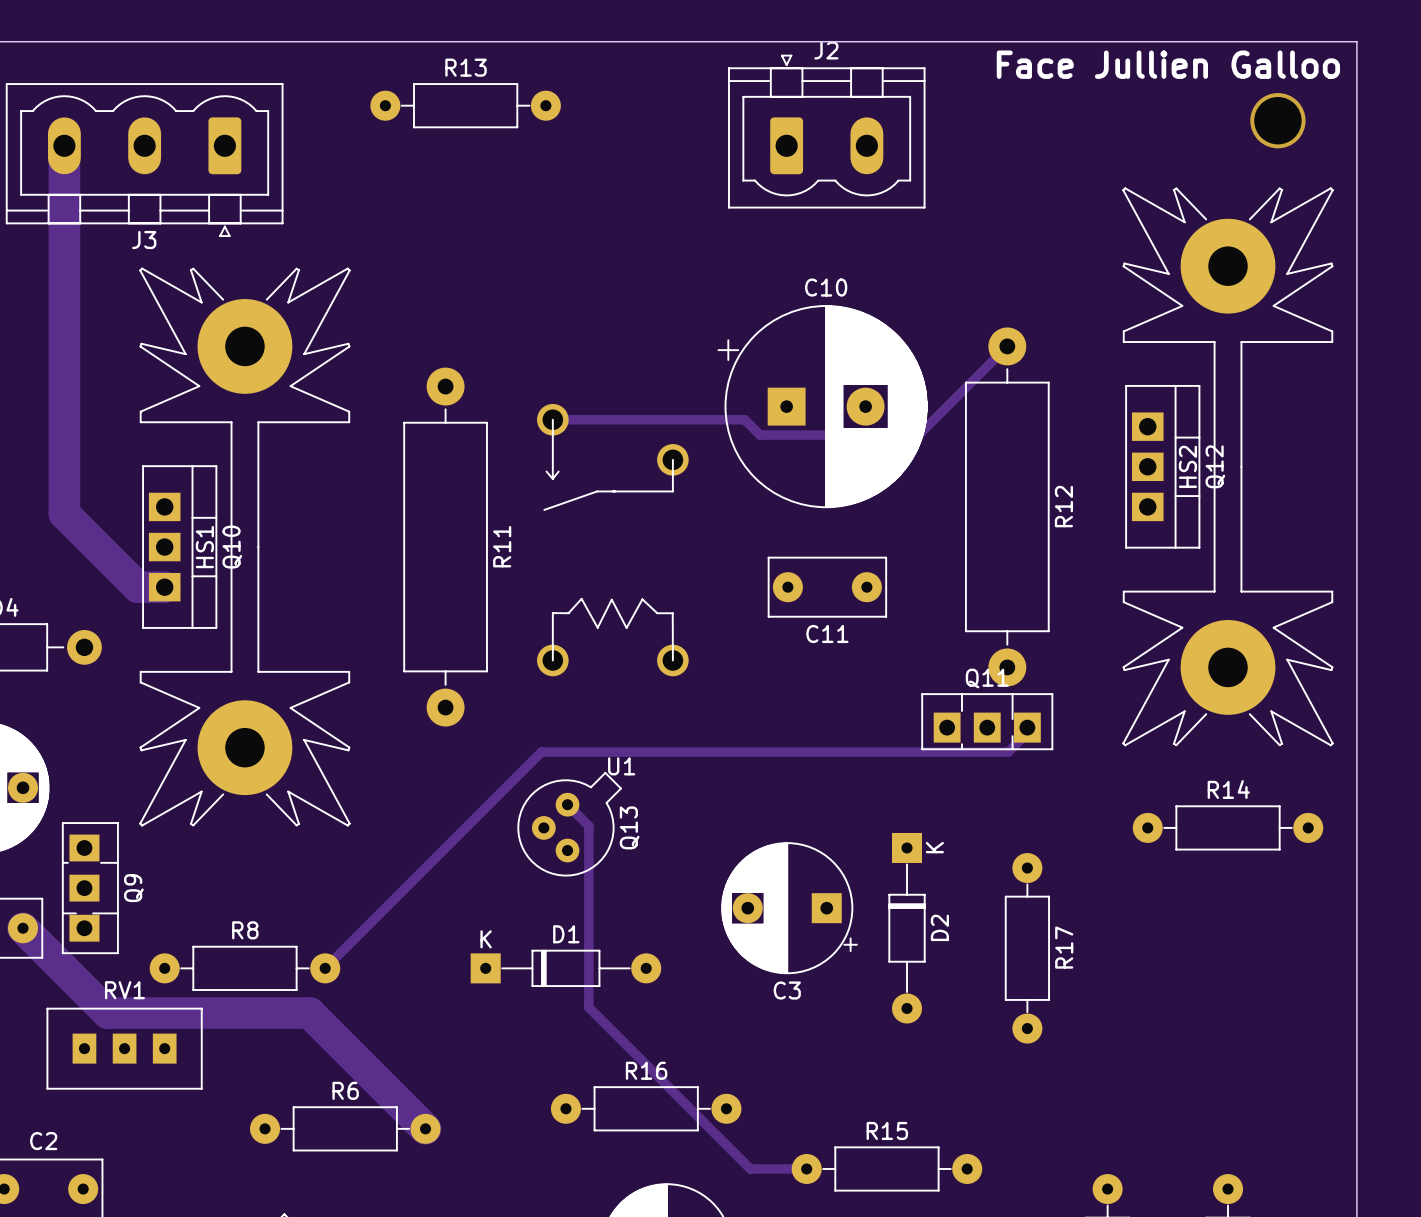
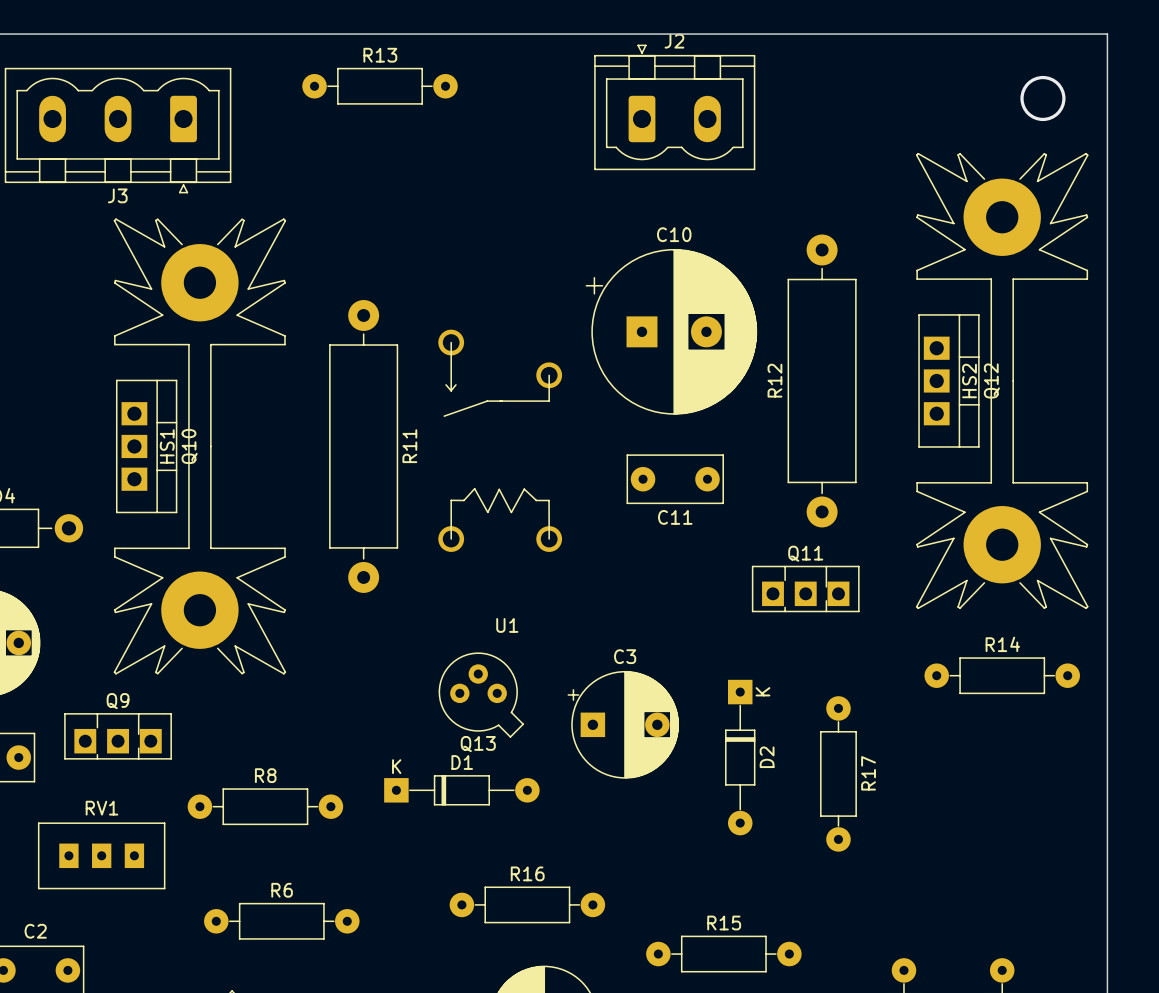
text: Face Jullien Galloo (1168, 64) -> none
track: (64, 145) (64, 513) (137, 587) (164, 587) -> none
track: (1007, 346) (918, 435) (760, 435) (744, 419) (552, 419) -> none
R12 position: (1007, 506) -> (822, 380)
R12 name position: R12 (1063, 506) -> R12 (774, 380)
track: (1027, 727) (1027, 732) (1008, 752) (541, 752) (325, 968) -> none
track: (567, 804) (588, 826) (588, 1007) (750, 1168) (806, 1168) -> none
Q13 rotation: 0° (569, 824) -> 90° clockwise (481, 695)
Q9 rotation: 0° (90, 888) -> 90° counterclockwise (118, 736)
C3 rotation: 0° (789, 908) -> 180° (623, 724)
track: (23, 928) (107, 1013) (309, 1013) (425, 1128) -> none
R8 position: (244, 968) -> (265, 806)

